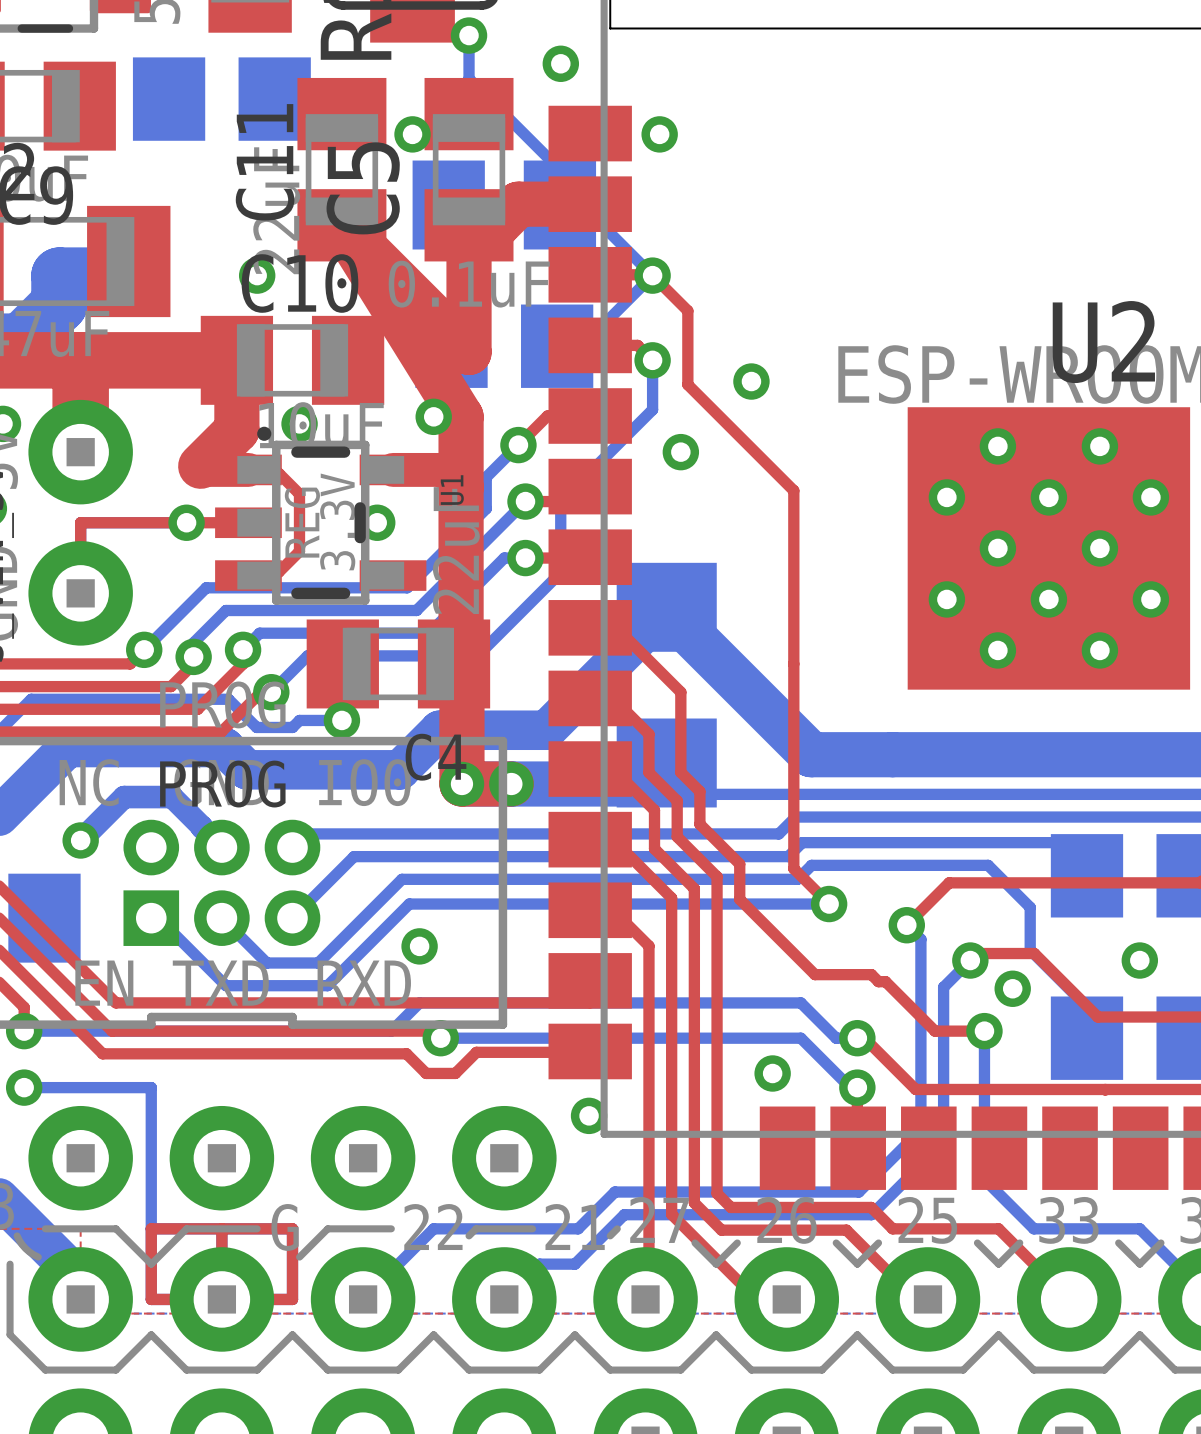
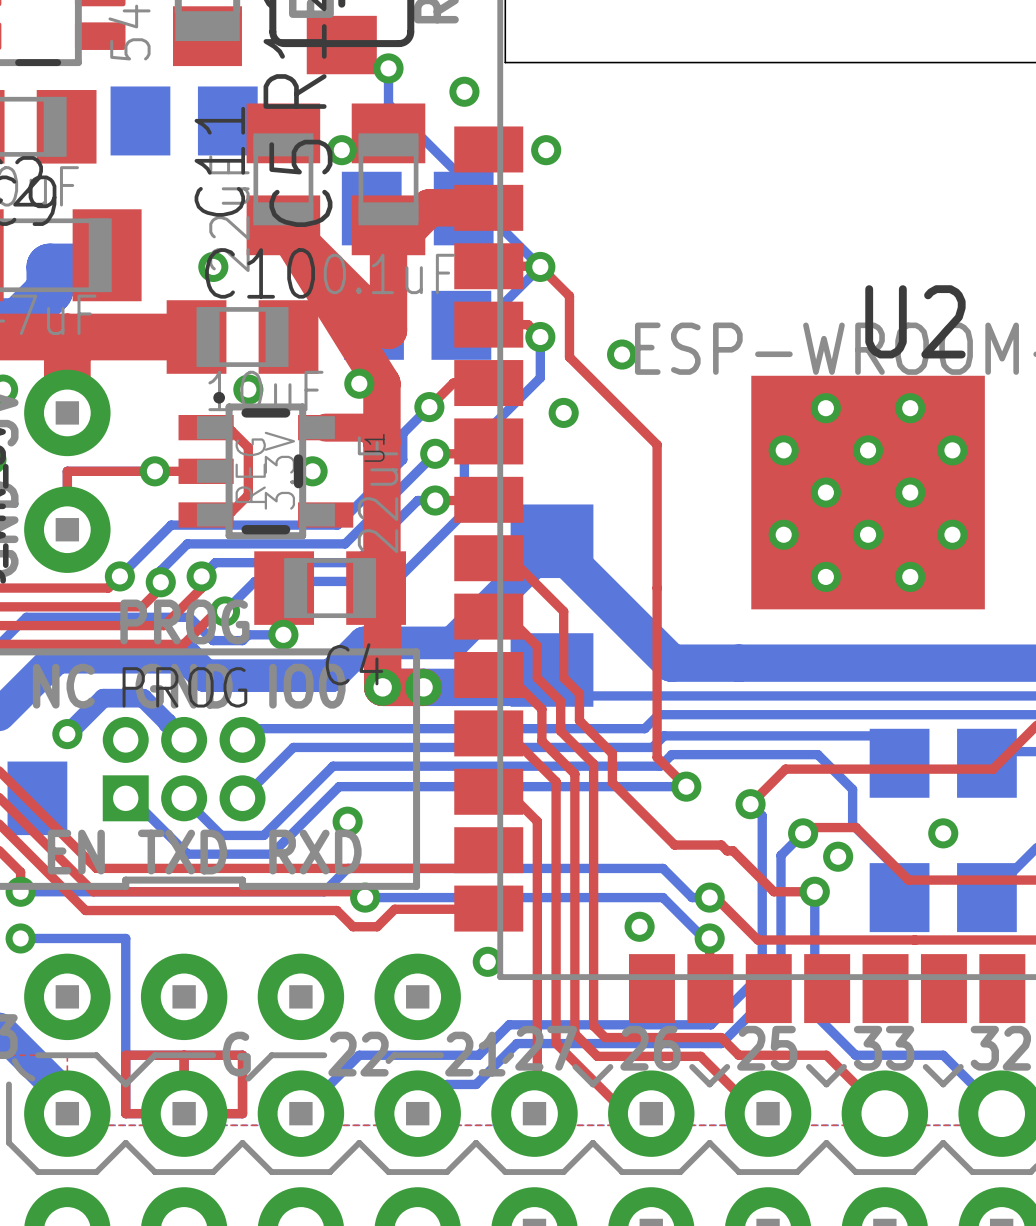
top track: (236, 360) (236, 430) (200, 466) (204, 469) (248, 469) -> none

